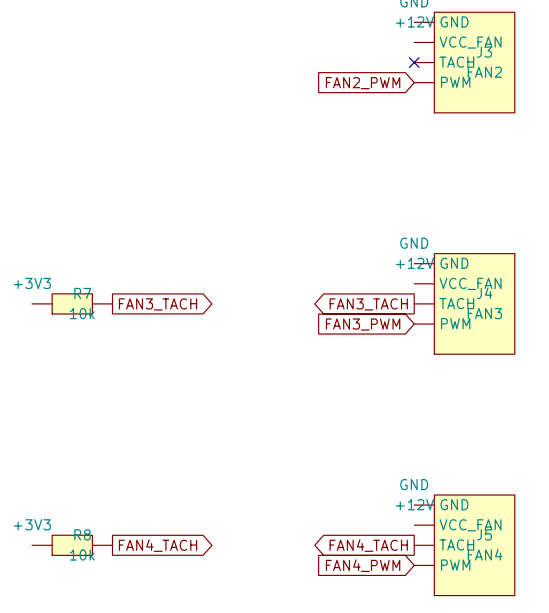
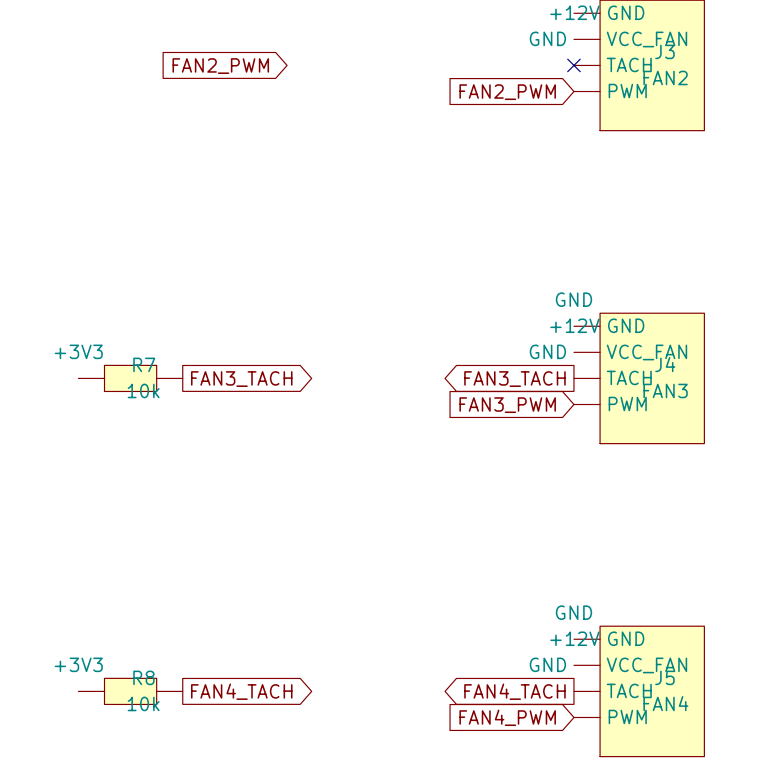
power symbol: none -> GND (547, 38)
global label: none -> FAN2_PWM (220, 66)
power symbol: none -> GND (547, 351)
power symbol: none -> GND (547, 664)

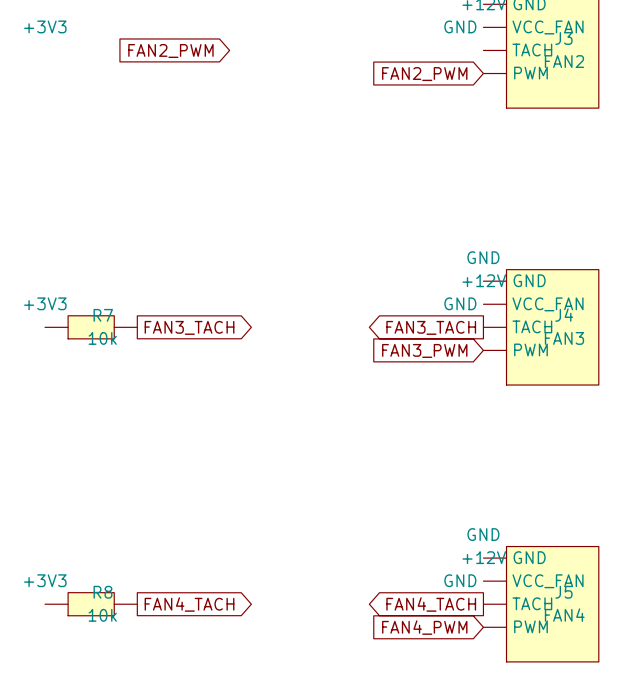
power symbol: none -> +3V3 (45, 26)
no-connect mark: (573, 65) -> none

